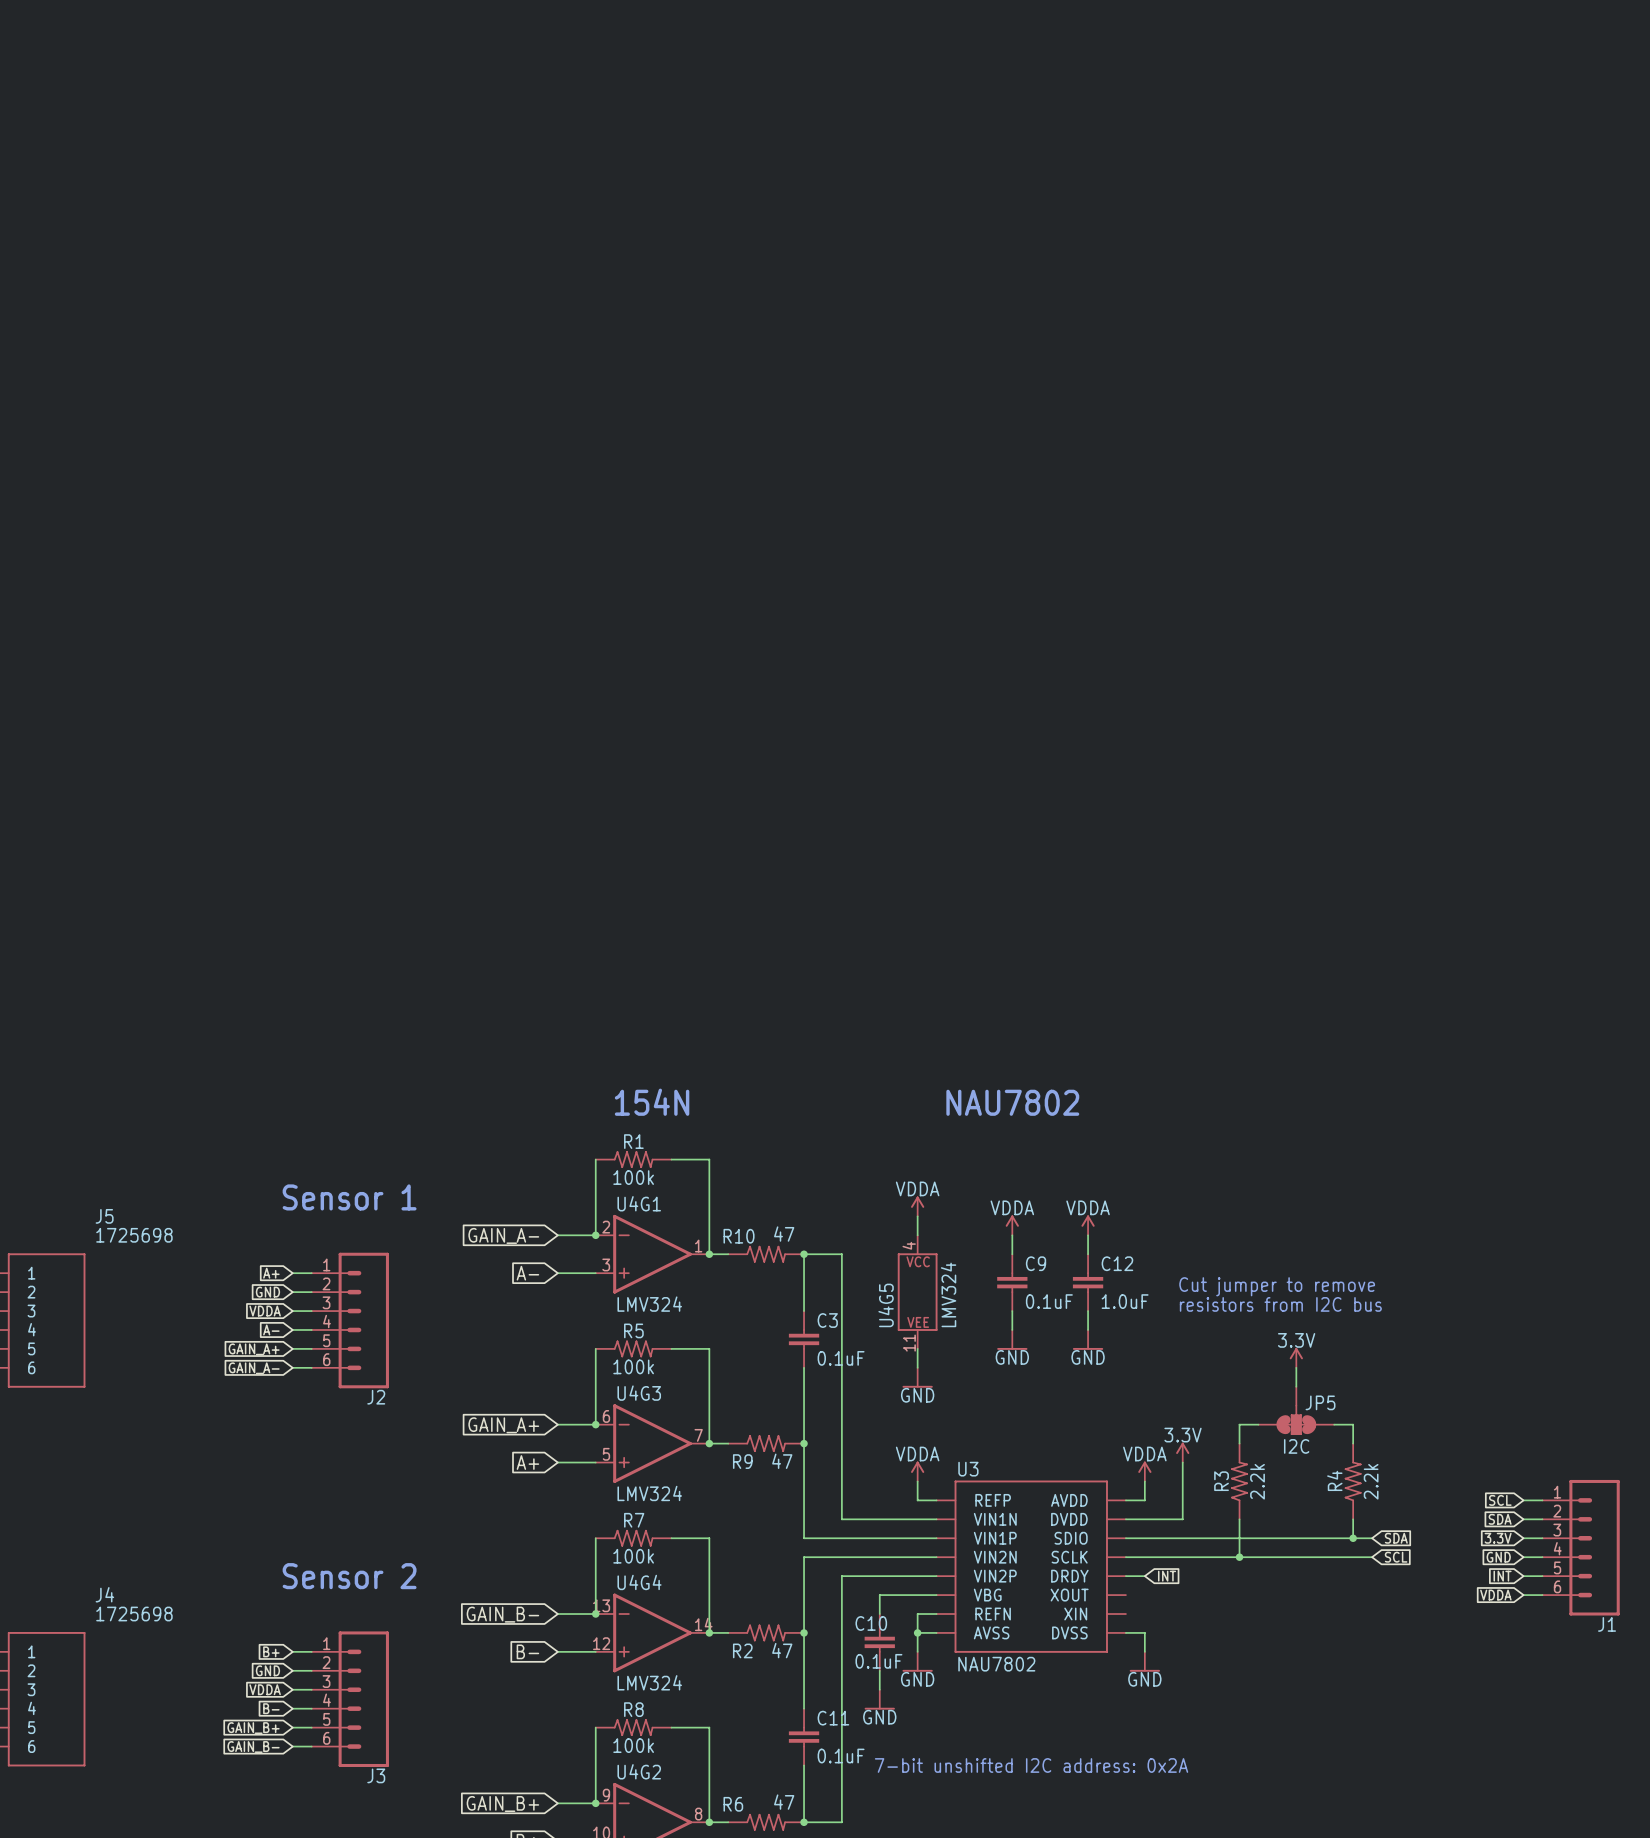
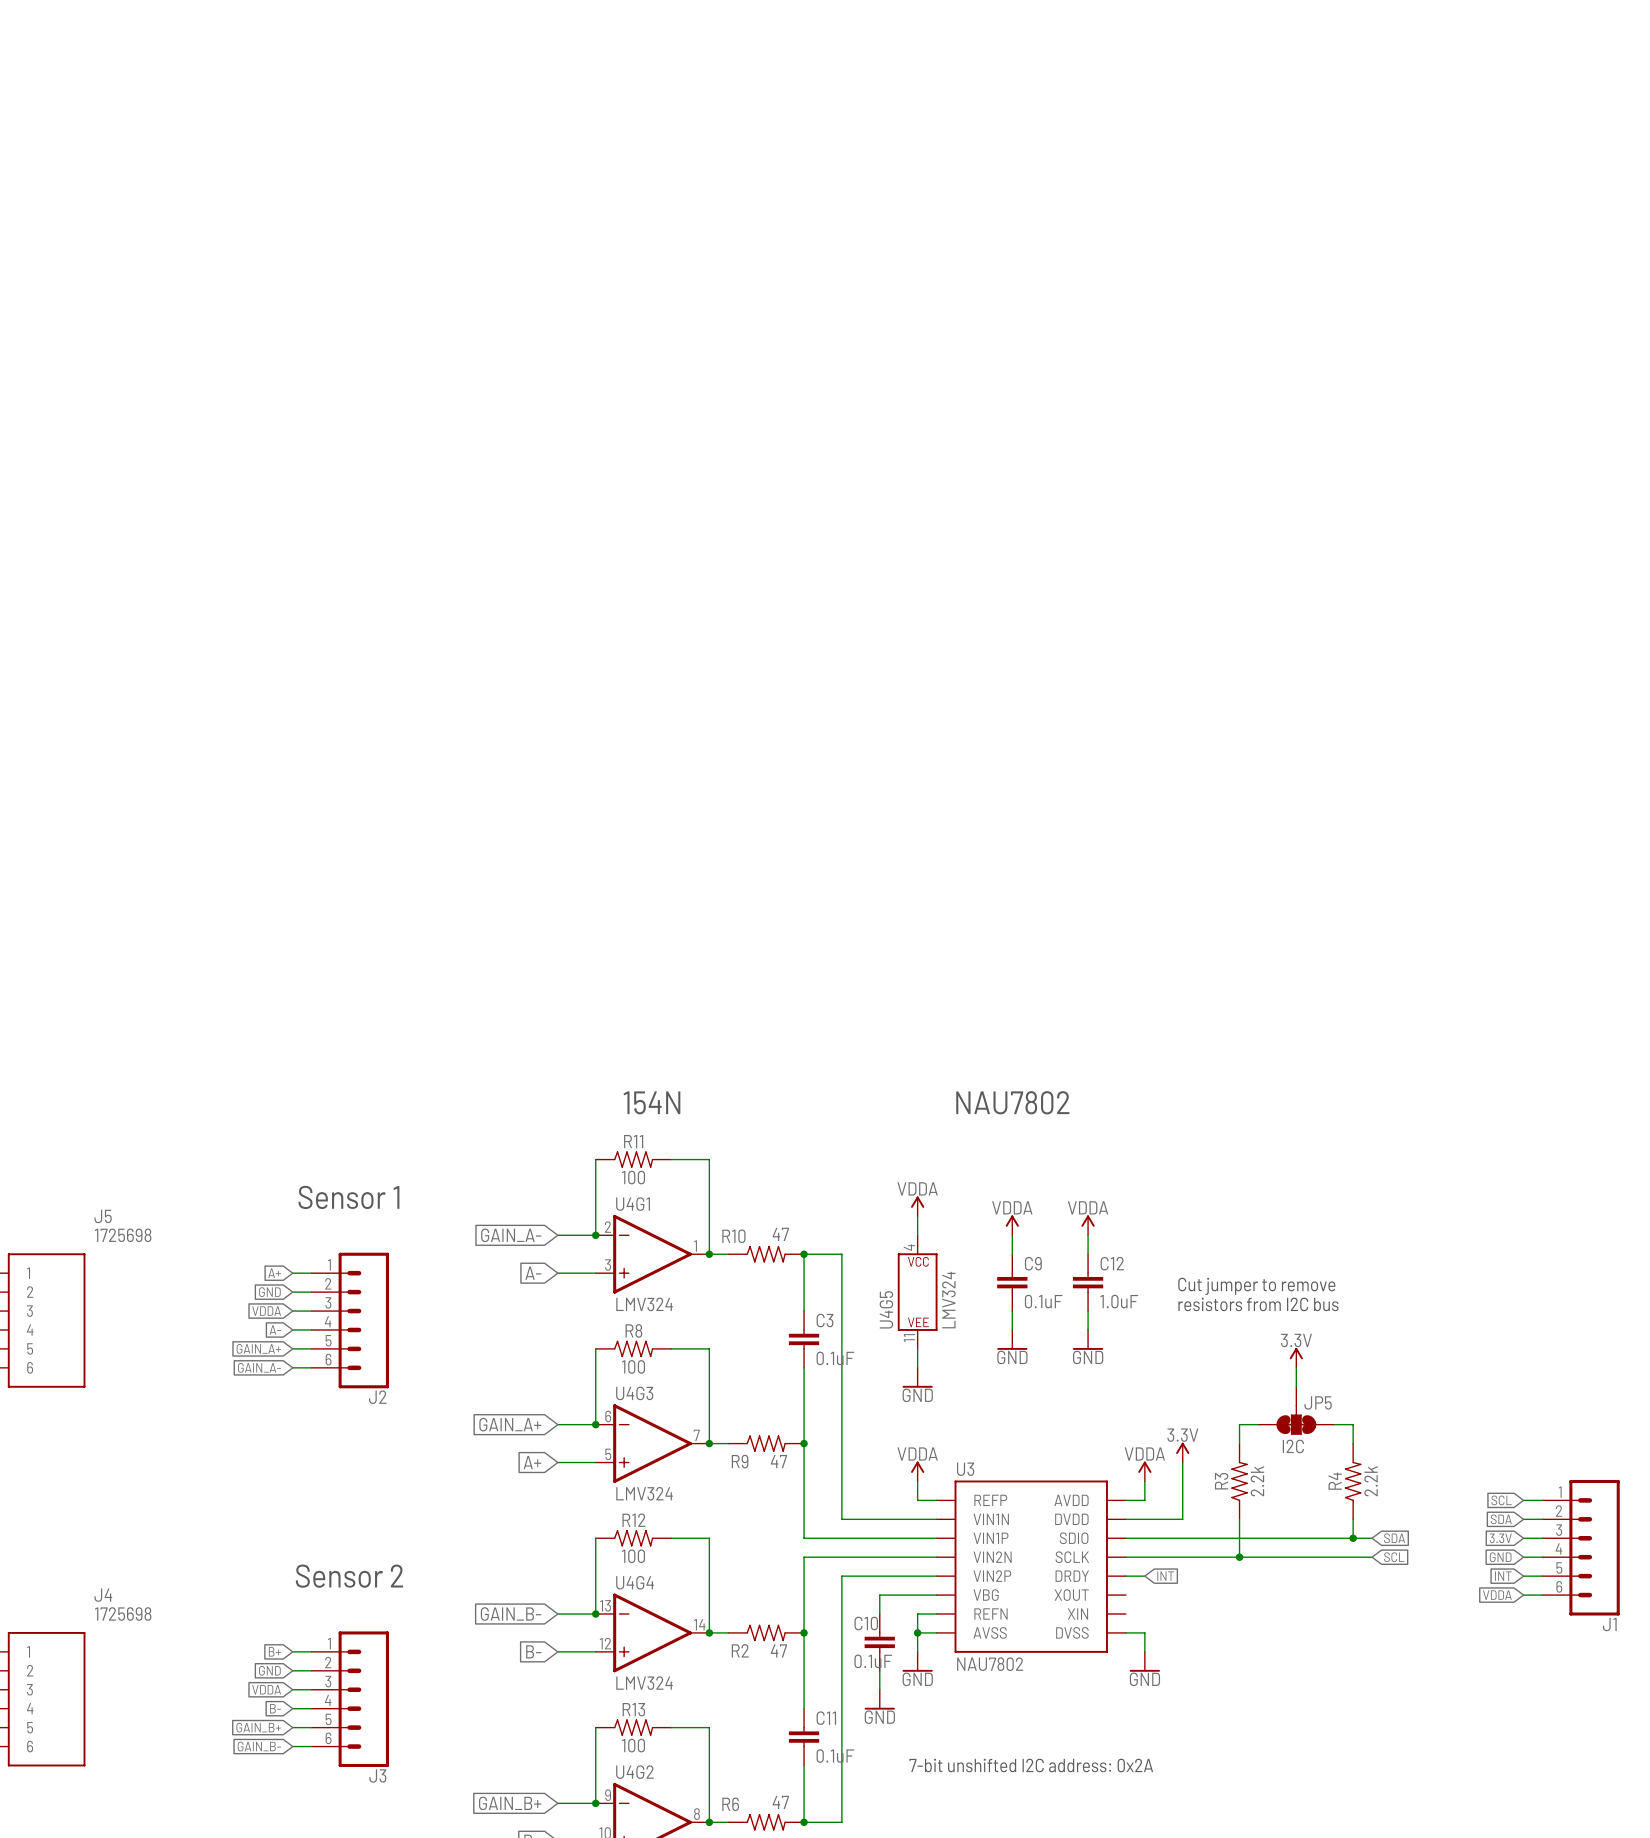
R1 name: R1 (633, 1141) -> R11 (633, 1141)
R1 value: 100k (633, 1177) -> 100 (633, 1177)
R5 name: R5 (633, 1330) -> R8 (633, 1330)
R5 value: 100k (633, 1366) -> 100 (633, 1366)
R7 name: R7 (634, 1520) -> R12 (633, 1520)
R7 value: 100k (633, 1556) -> 100 (633, 1556)
R8 name: R8 (633, 1709) -> R13 (633, 1709)
R8 value: 100k (633, 1745) -> 100 (633, 1745)

